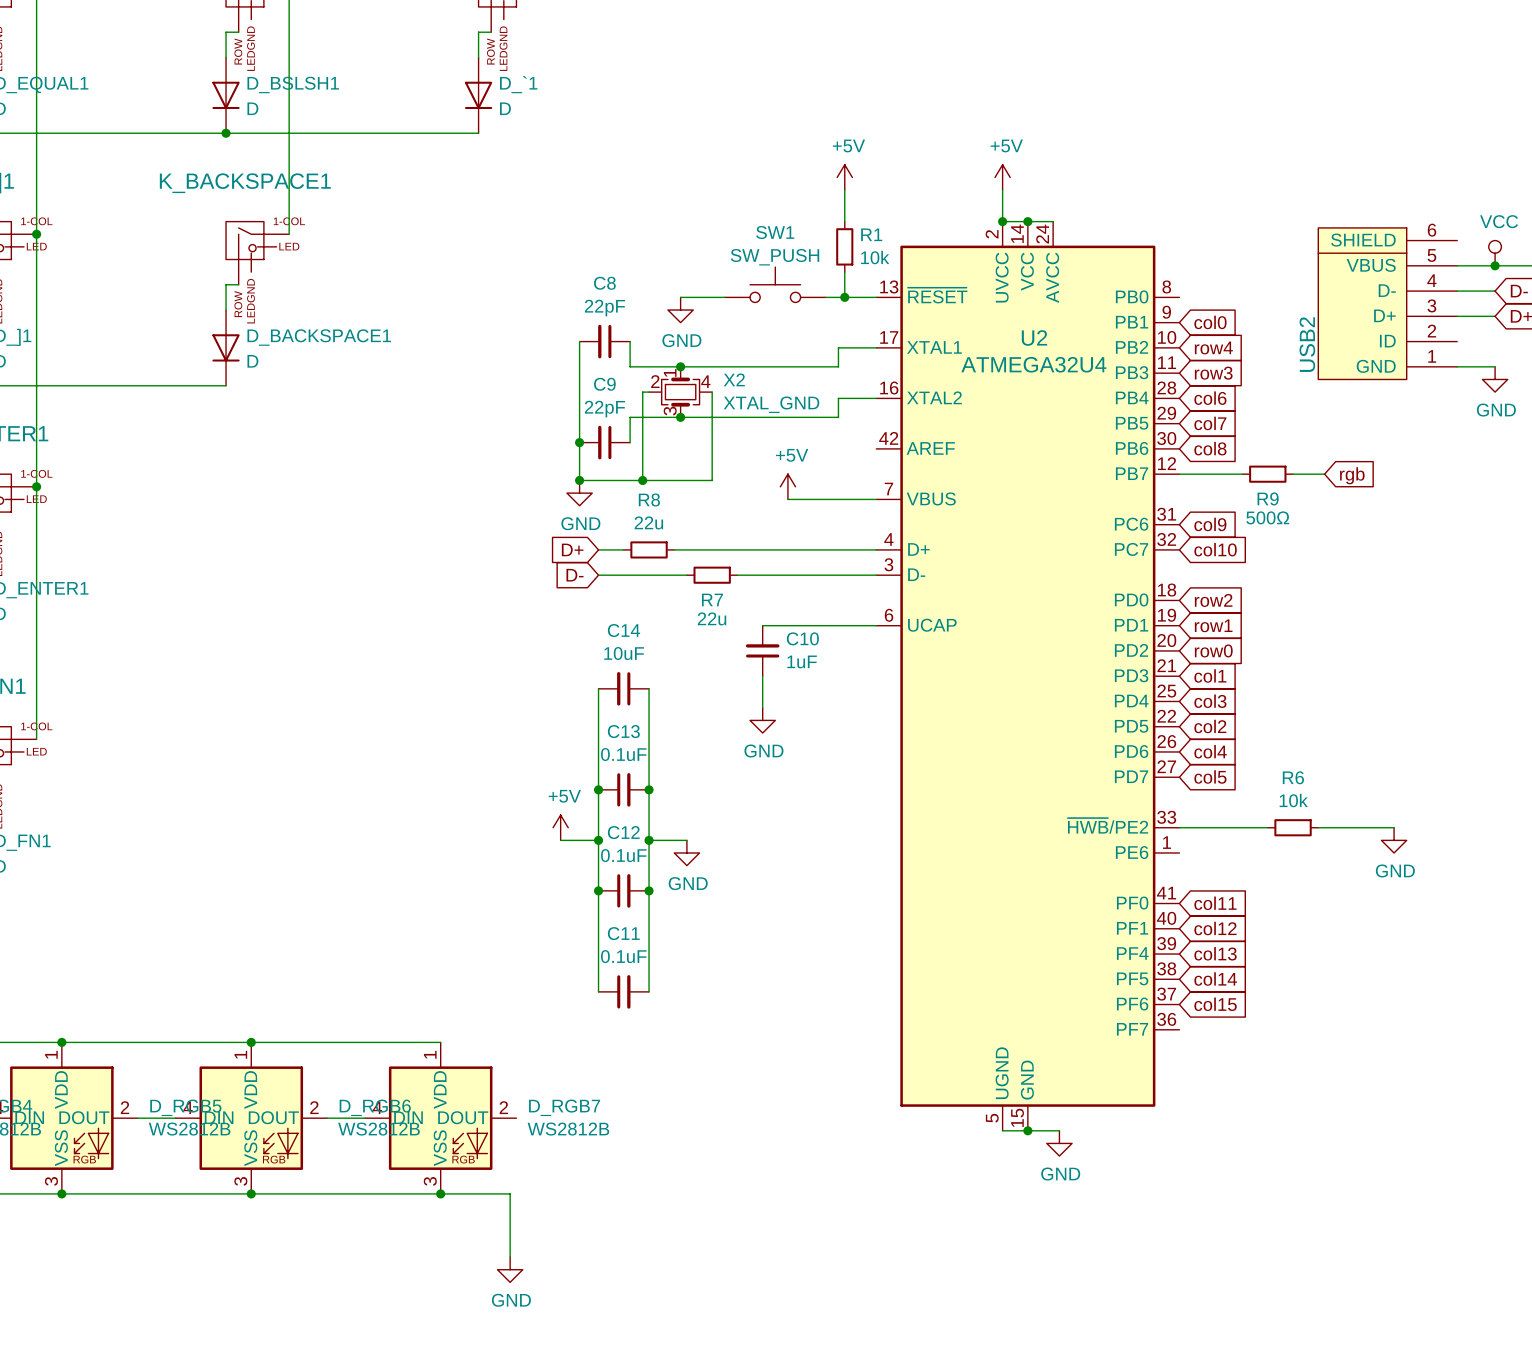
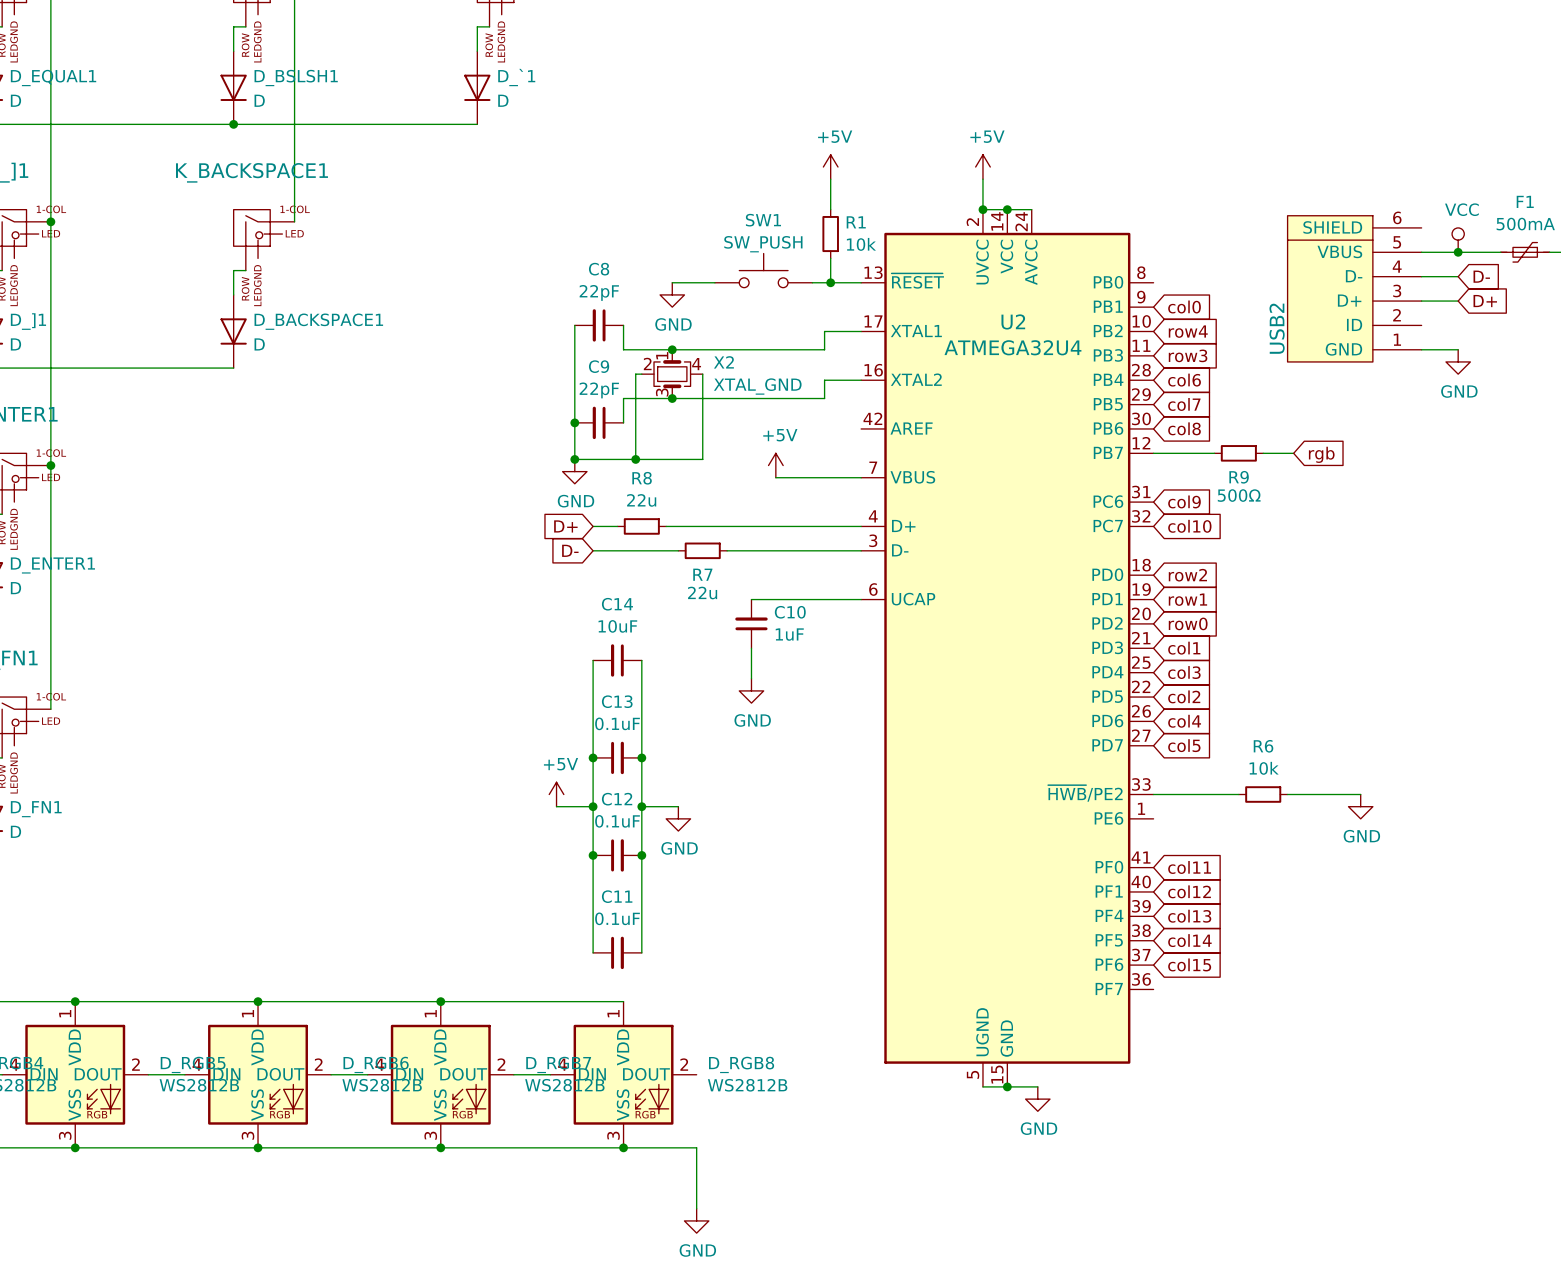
wire: none -> (440, 1001) (623, 1001)
junction: none -> (440, 1001)
wire: none -> (513, 1074) (550, 1074)
D_RGB8: none -> WS2812B (623, 1074)
wire: (510, 1193) (510, 1257) -> (507, 1147) (696, 1147) (696, 1208)
junction: none -> (623, 1147)
power symbol position: GND (510, 1269) -> GND (696, 1220)

